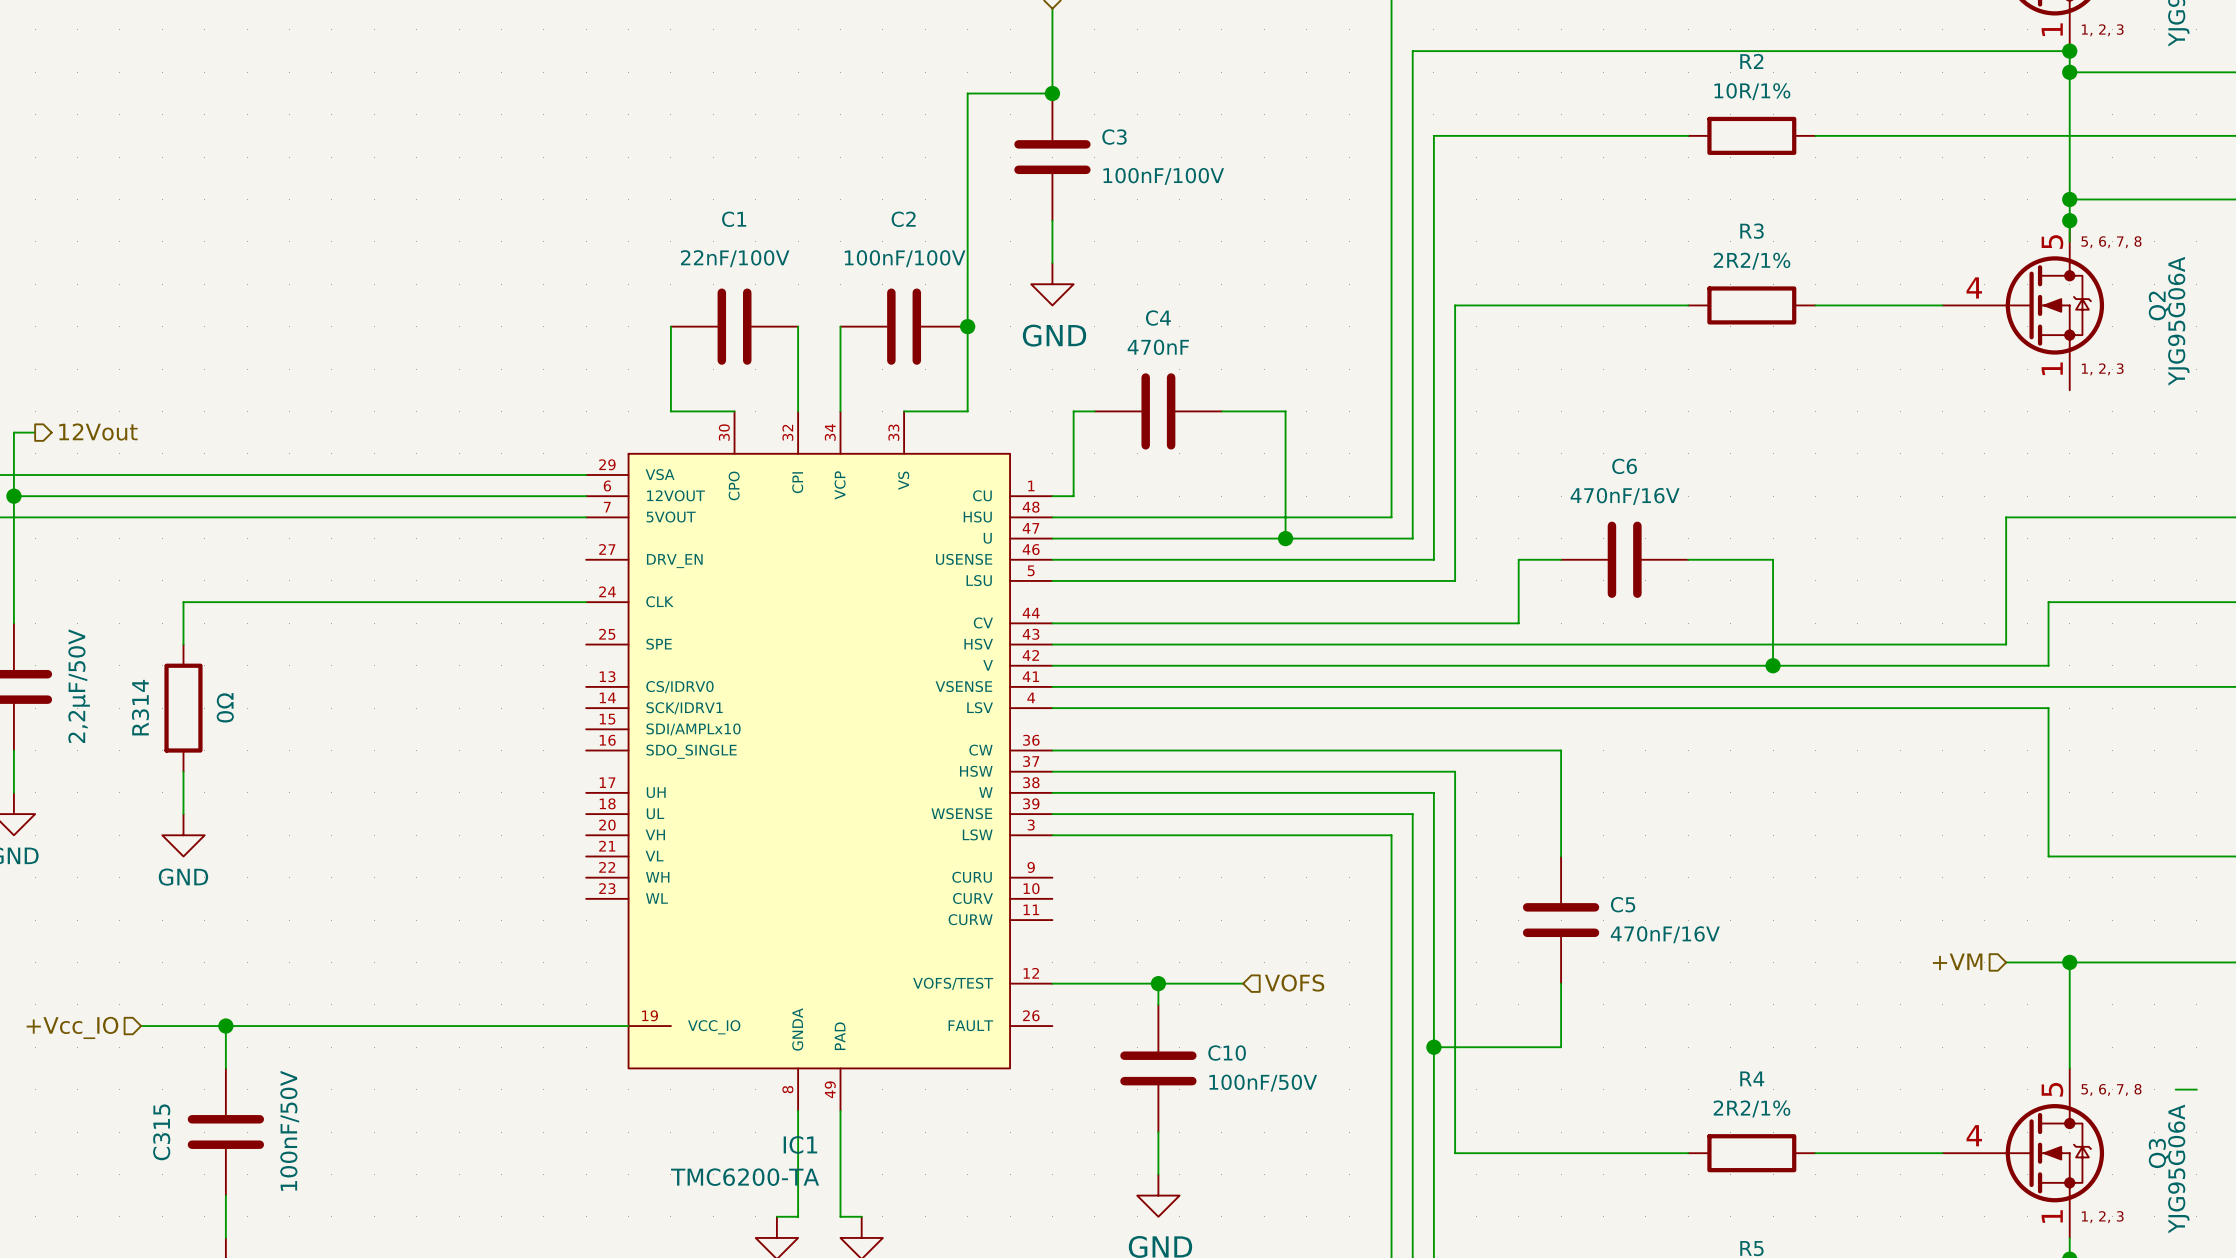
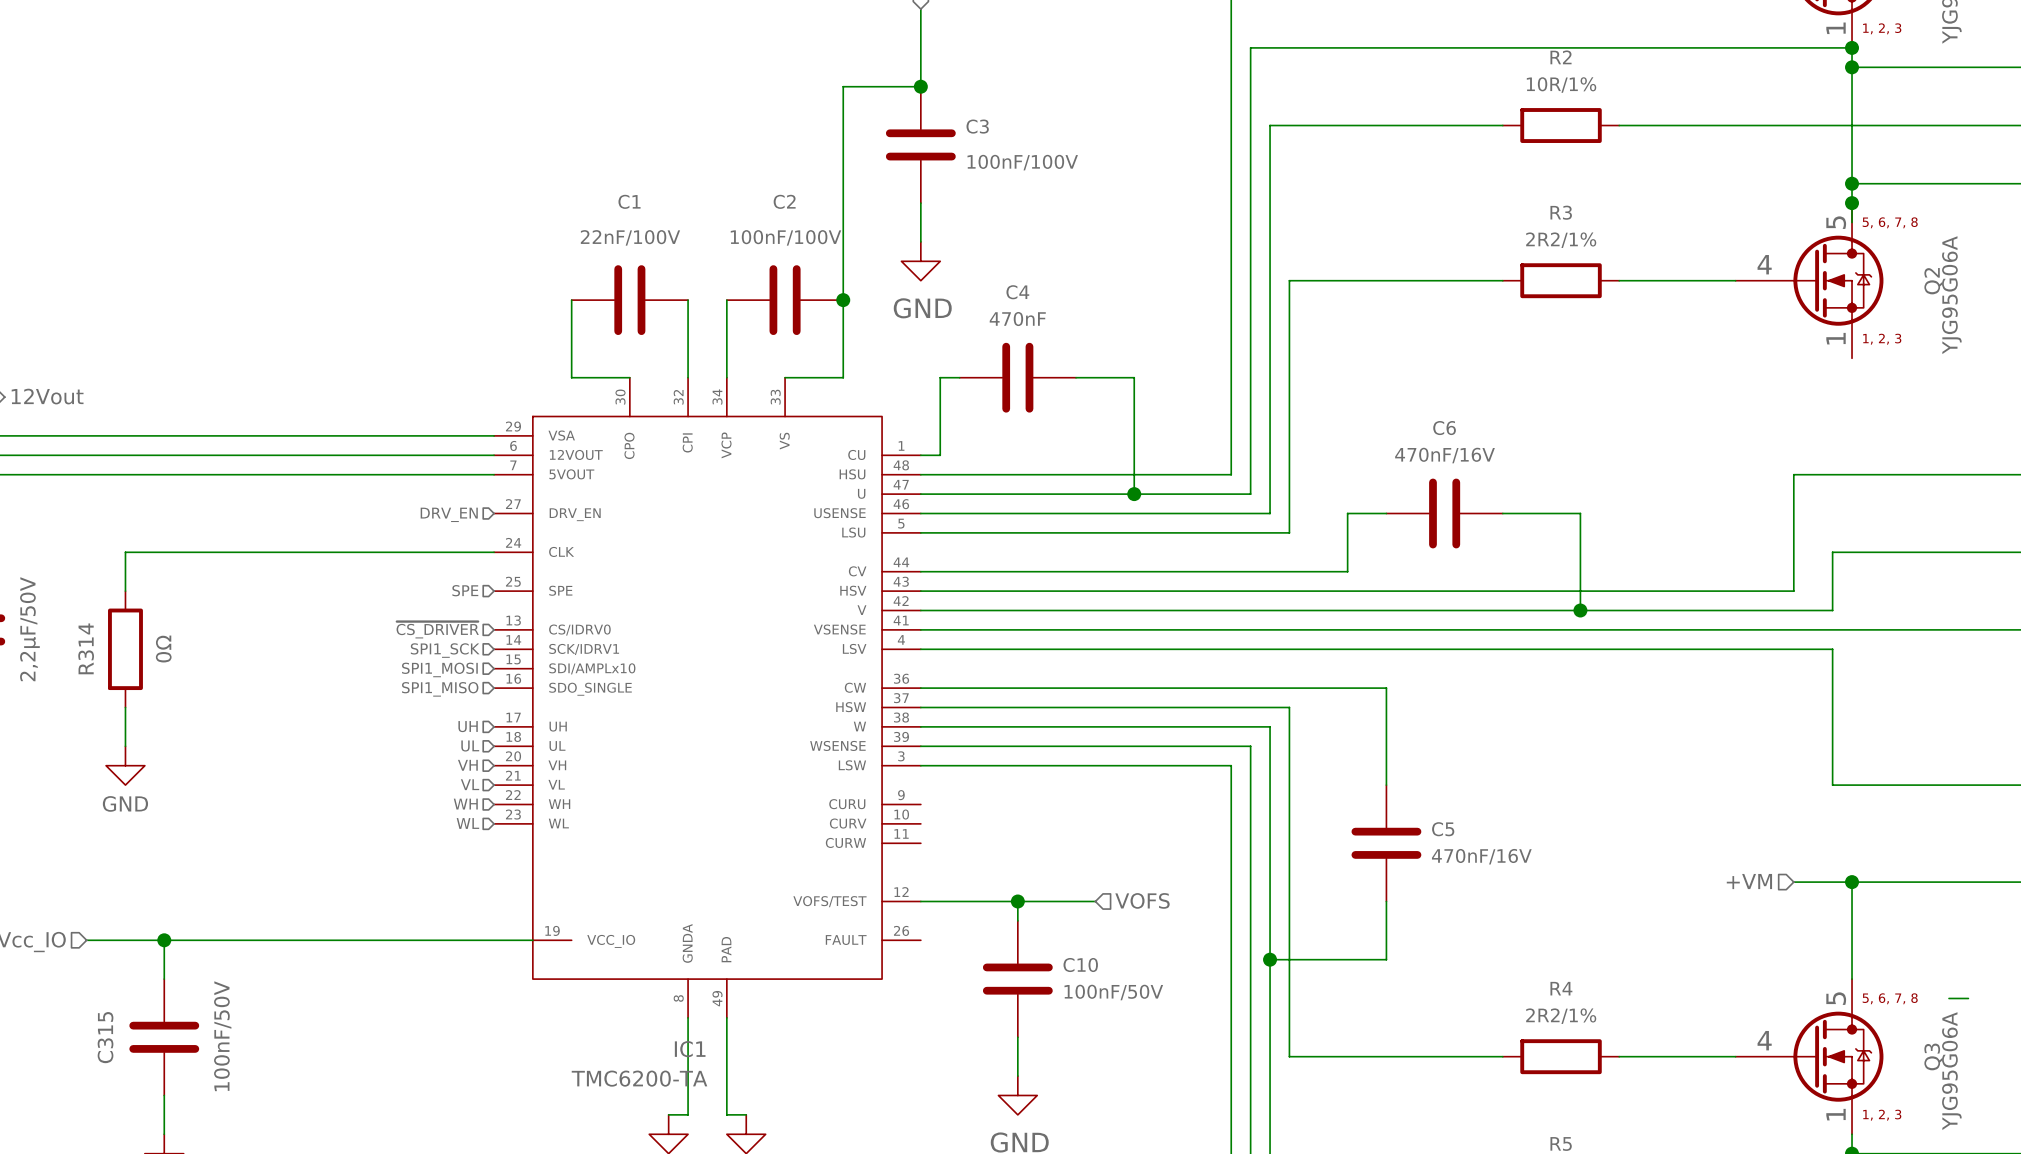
hierarchical label: none -> DRV_EN (449, 514)
hierarchical label: none -> SPE (465, 590)
hierarchical label: none -> ~{CS_DRIVER} (437, 630)
hierarchical label: none -> SPI1_SCK (445, 650)
hierarchical label: none -> SPI1_MOSI (439, 669)
hierarchical label: none -> SPI1_MISO (440, 689)
hierarchical label: none -> UH (468, 726)
hierarchical label: none -> UL (470, 745)
hierarchical label: none -> VH (467, 765)
hierarchical label: none -> VL (470, 784)
hierarchical label: none -> WH (465, 804)
hierarchical label: none -> WL (467, 823)

